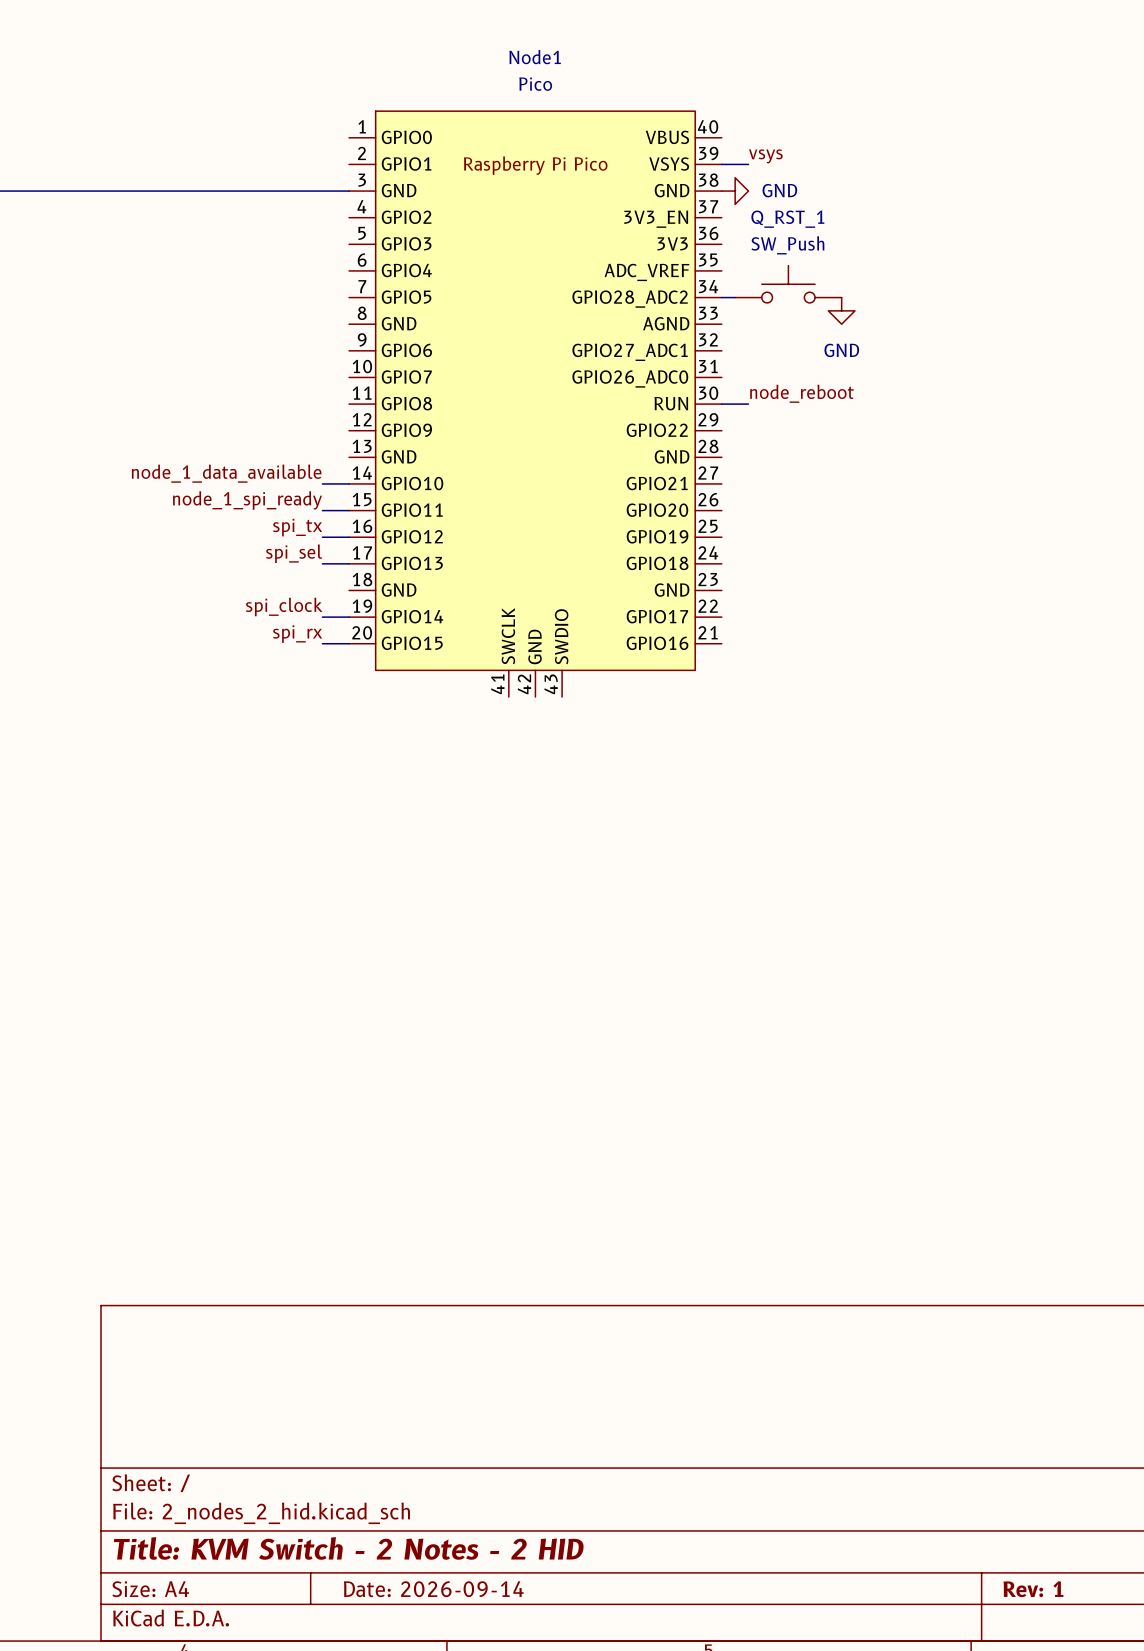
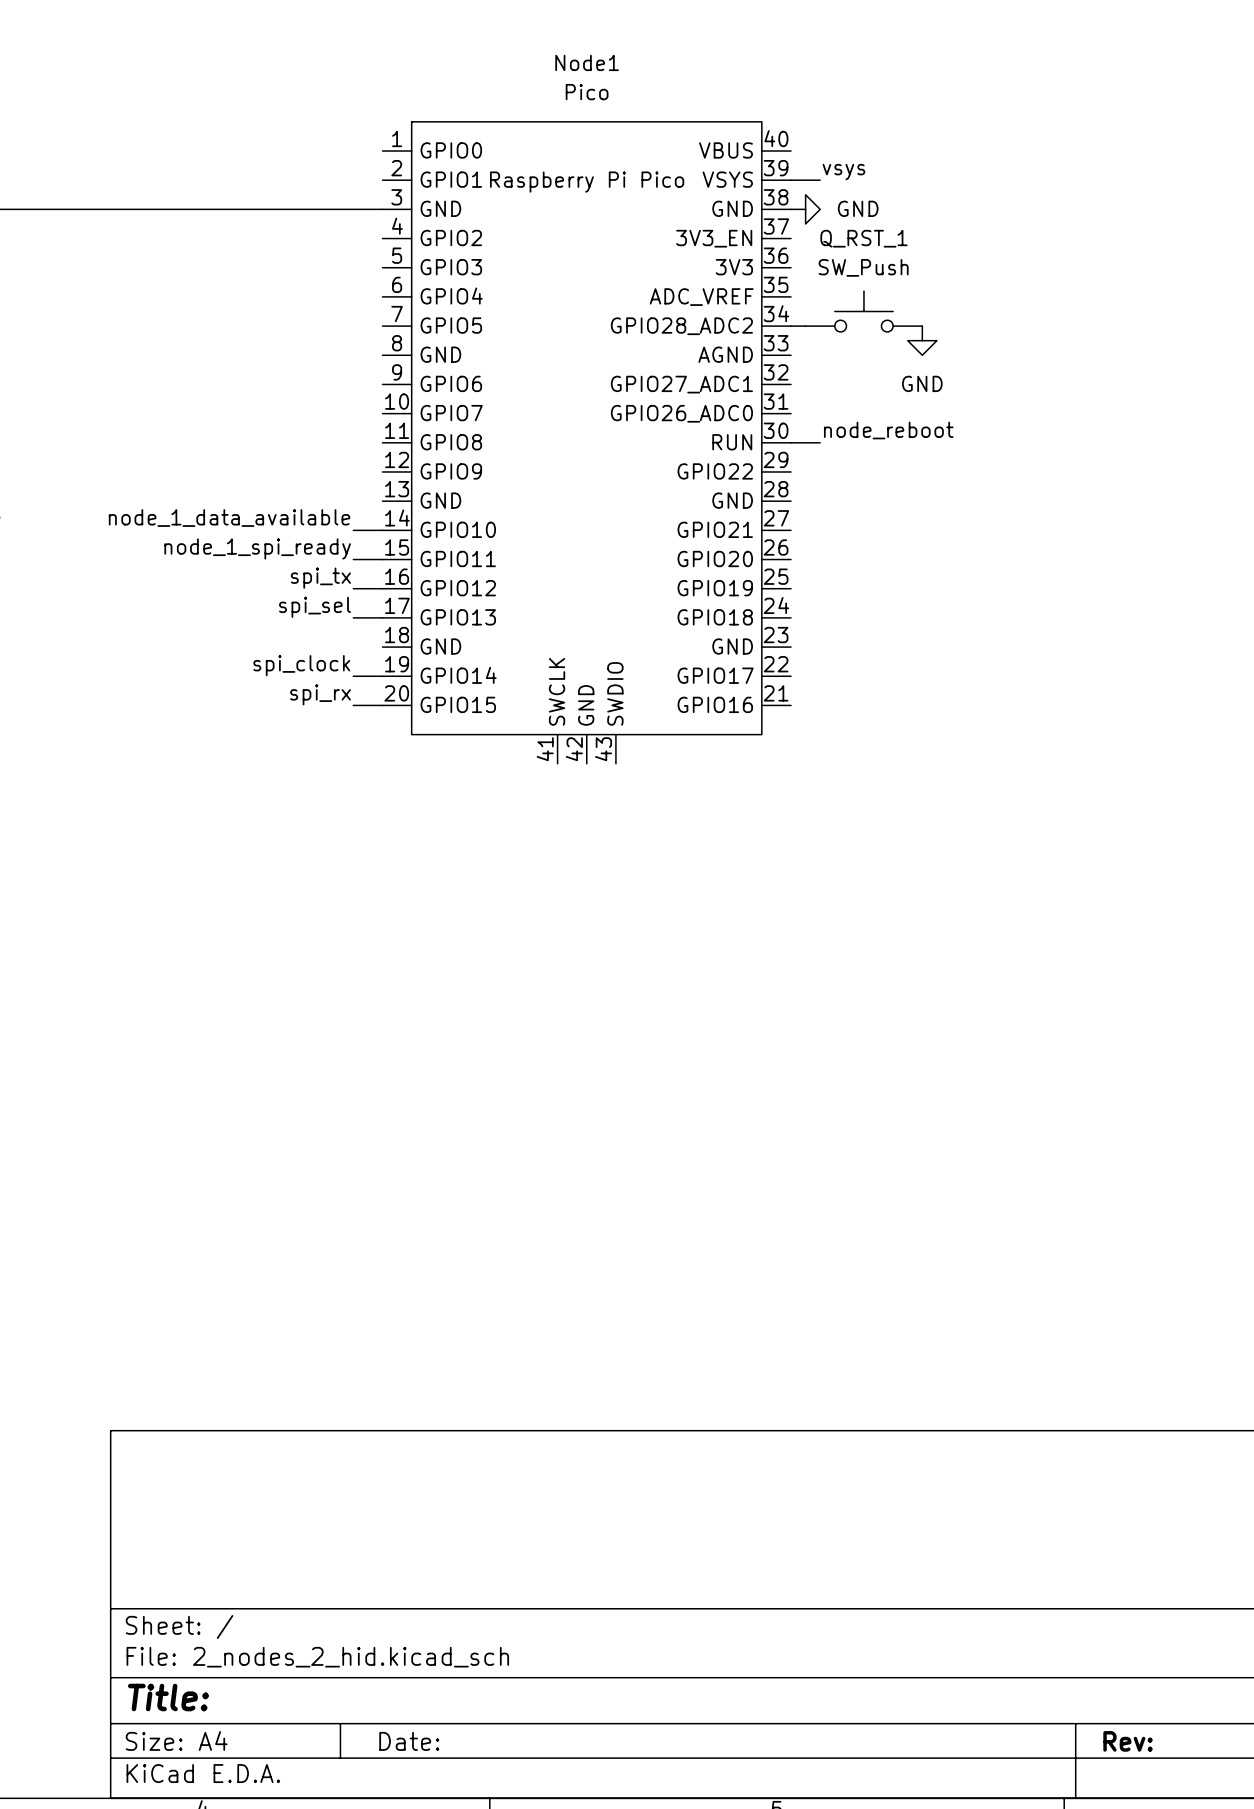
title block: Title: KVM Switch - 2 Notes - 2 HID (348, 1548) -> Title: (168, 1697)
title block: Date: 2026-09-14 (433, 1589) -> Date: (409, 1741)
title block: Rev: 1 (1033, 1589) -> Rev: (1128, 1741)

